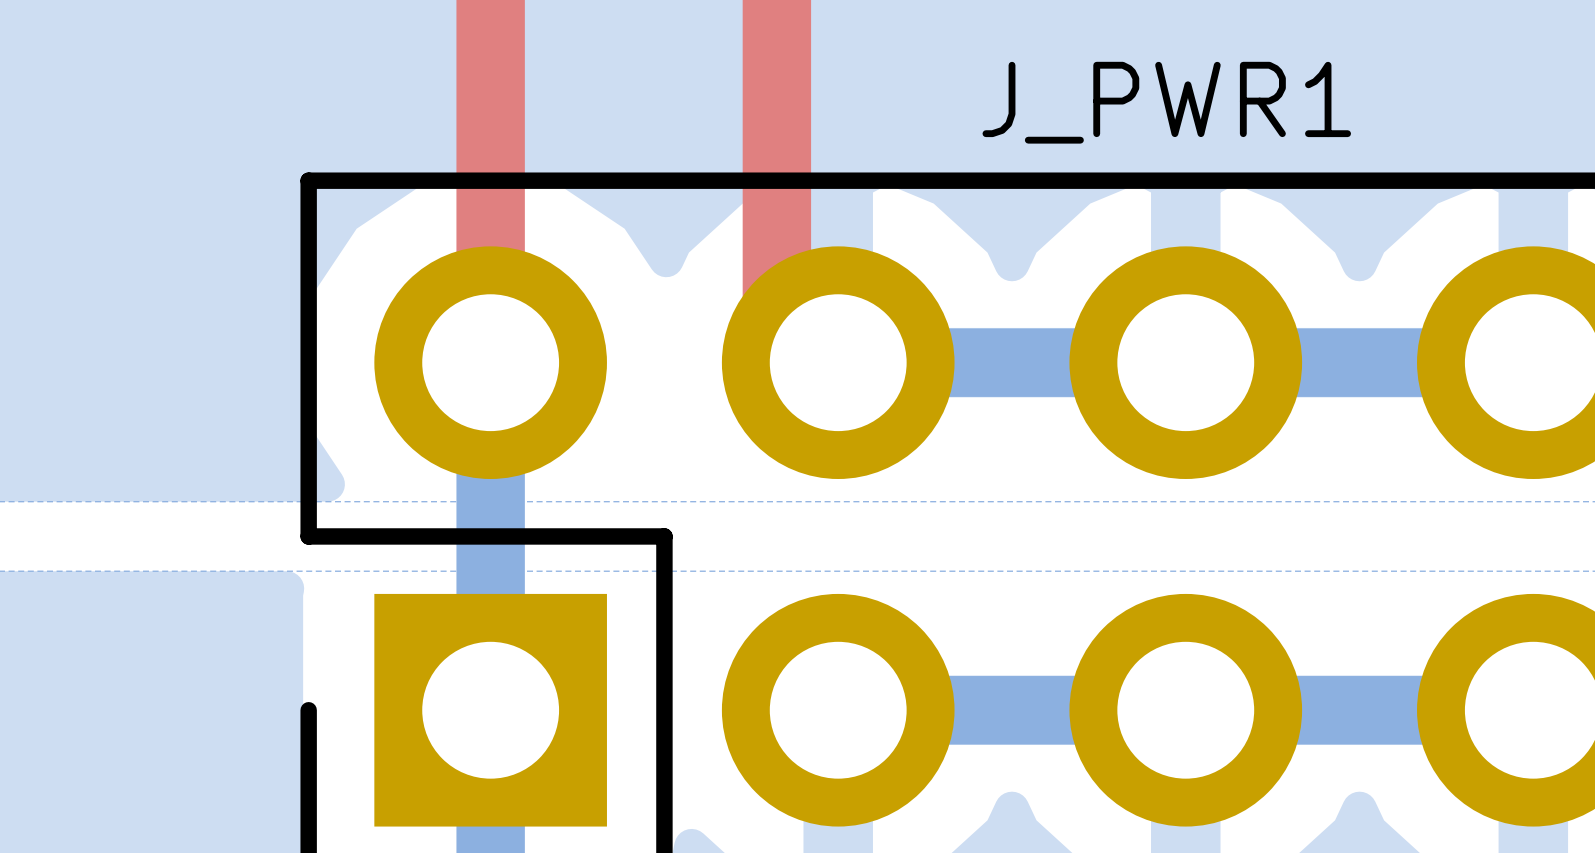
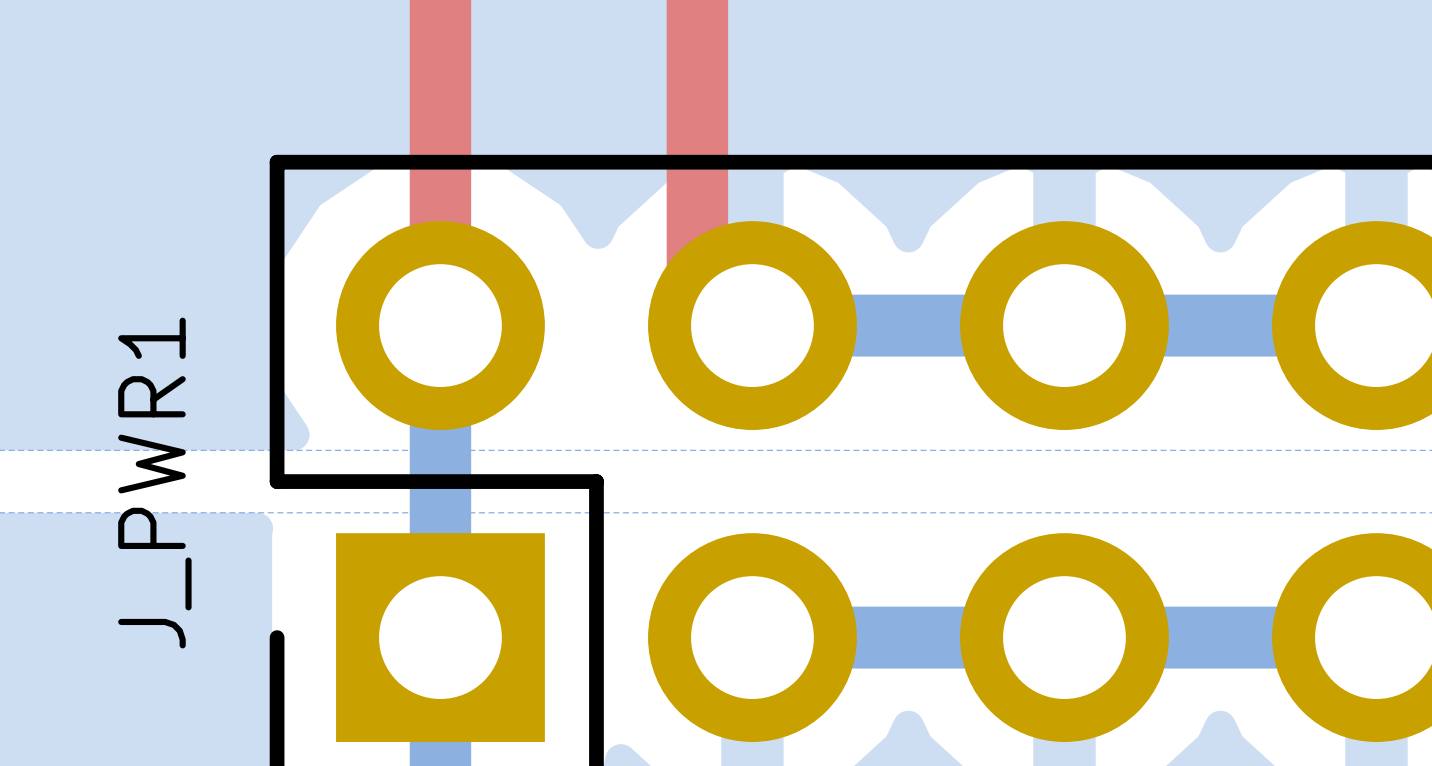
J_PWR1 name rotation: 0° (1166, 102) -> 90° counterclockwise (154, 483)
J_PWR1 name position: J_PWR1 (1166, 102) -> J_PWR1 (154, 483)

